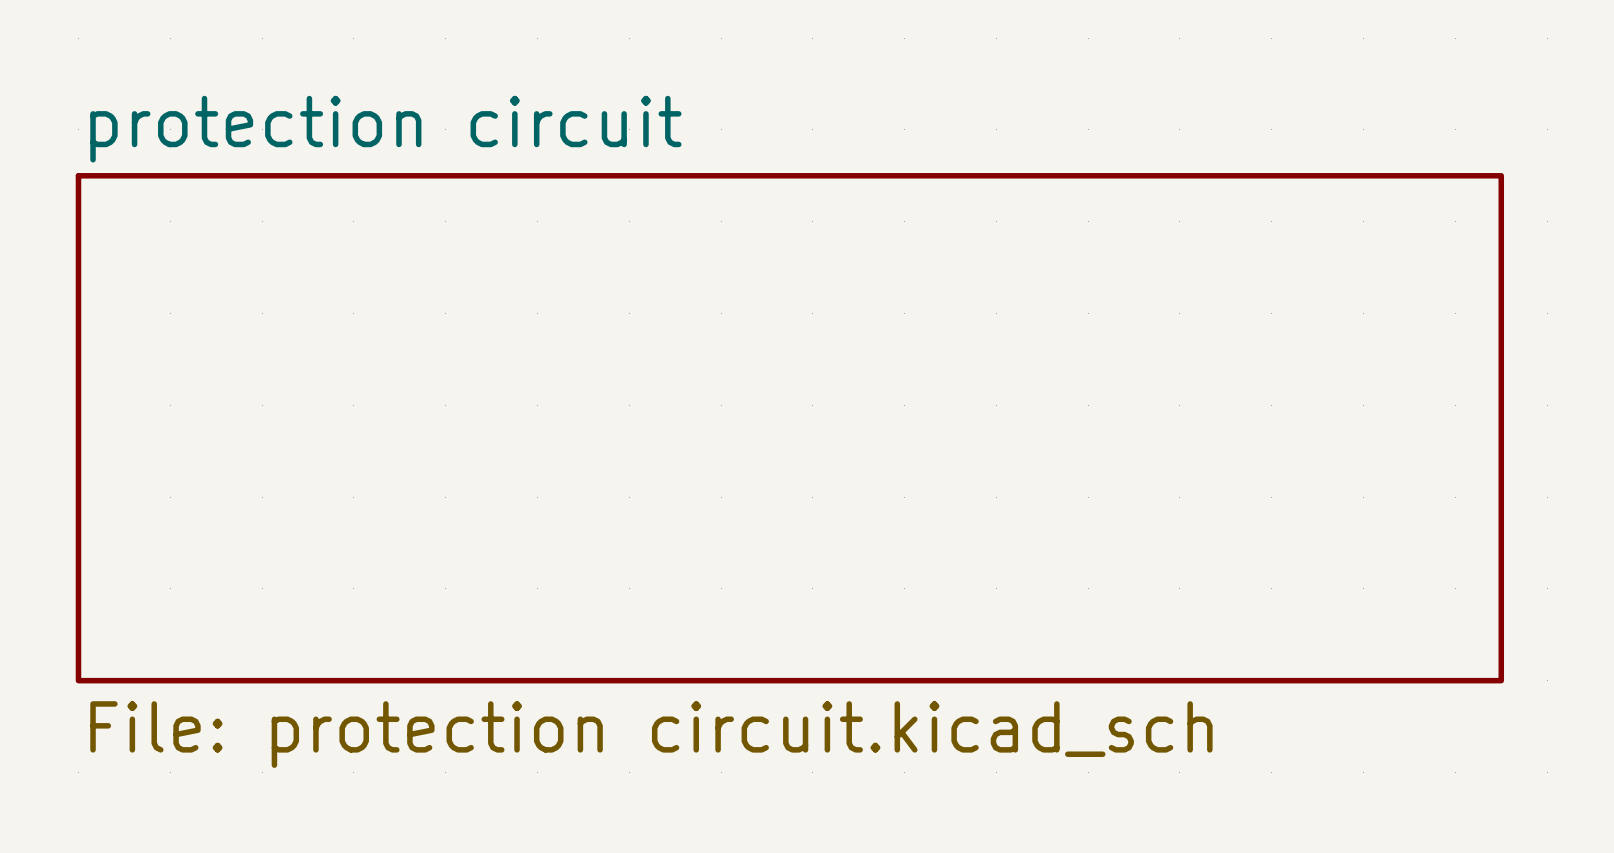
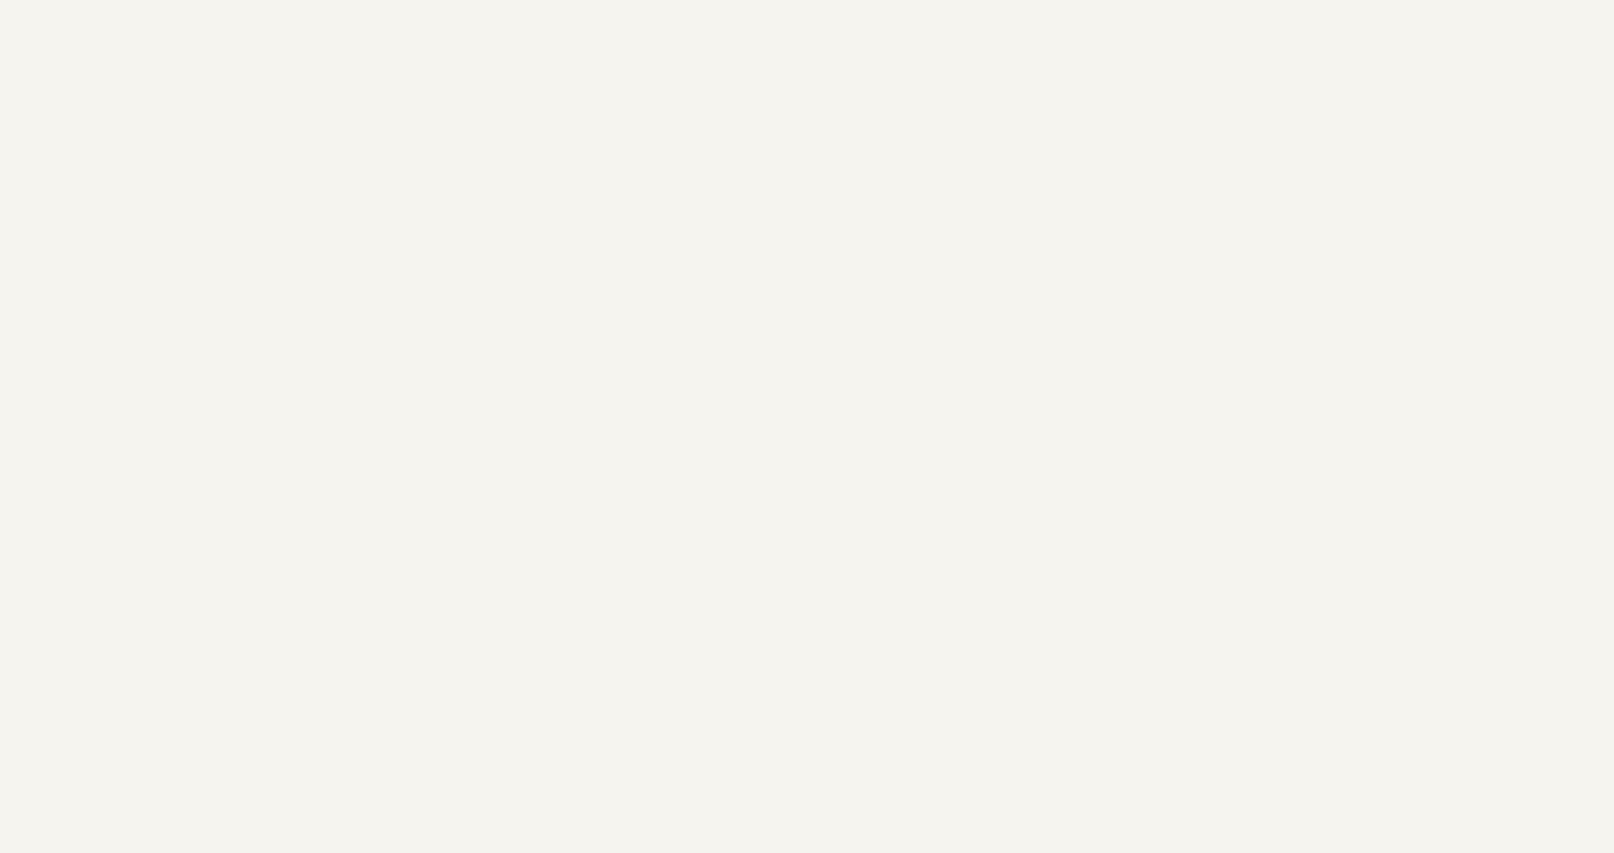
sheet protection circuit: File: protection circuit.kicad_sch (789, 428) -> none

